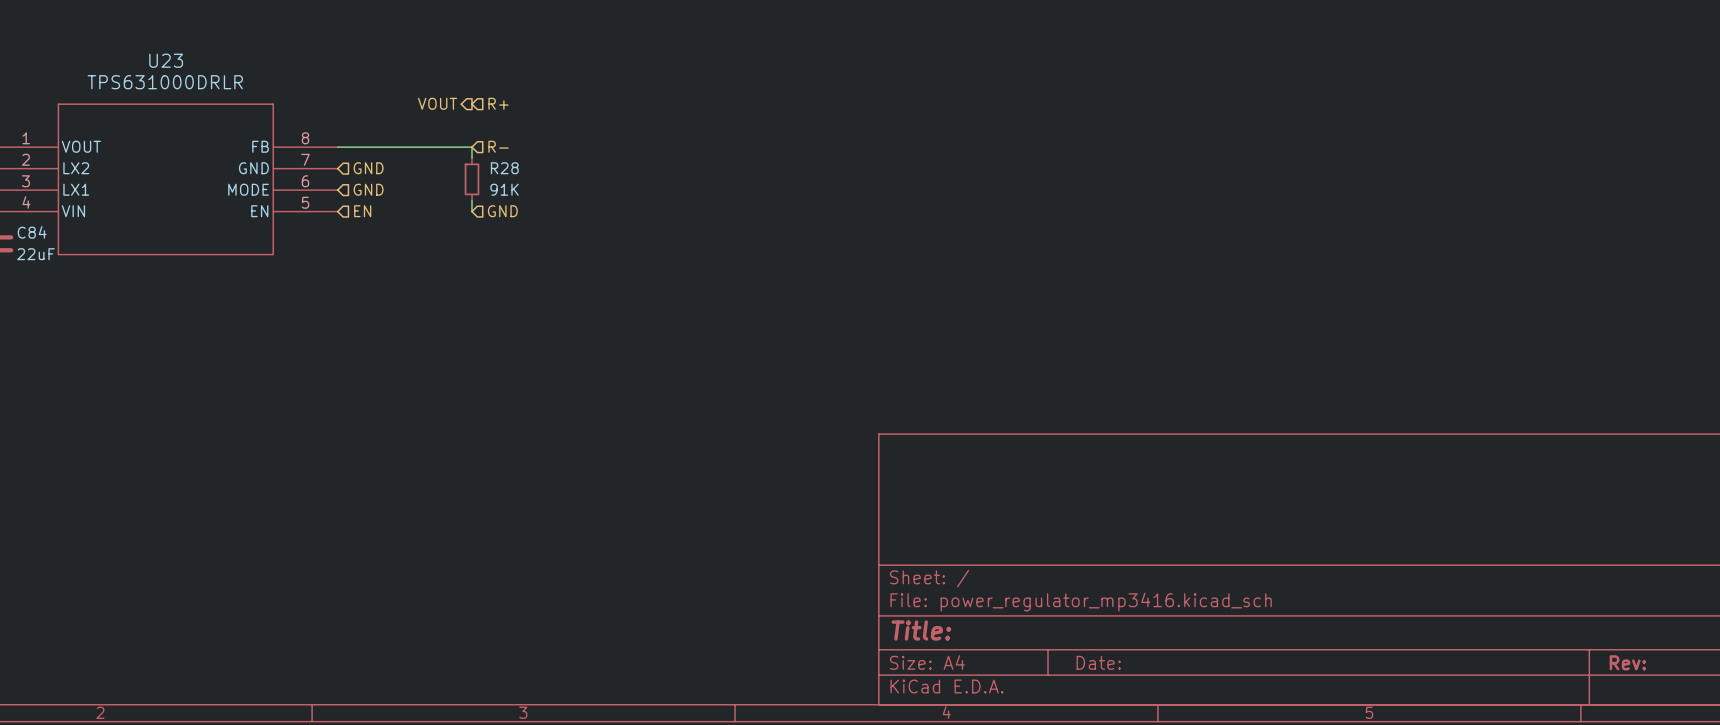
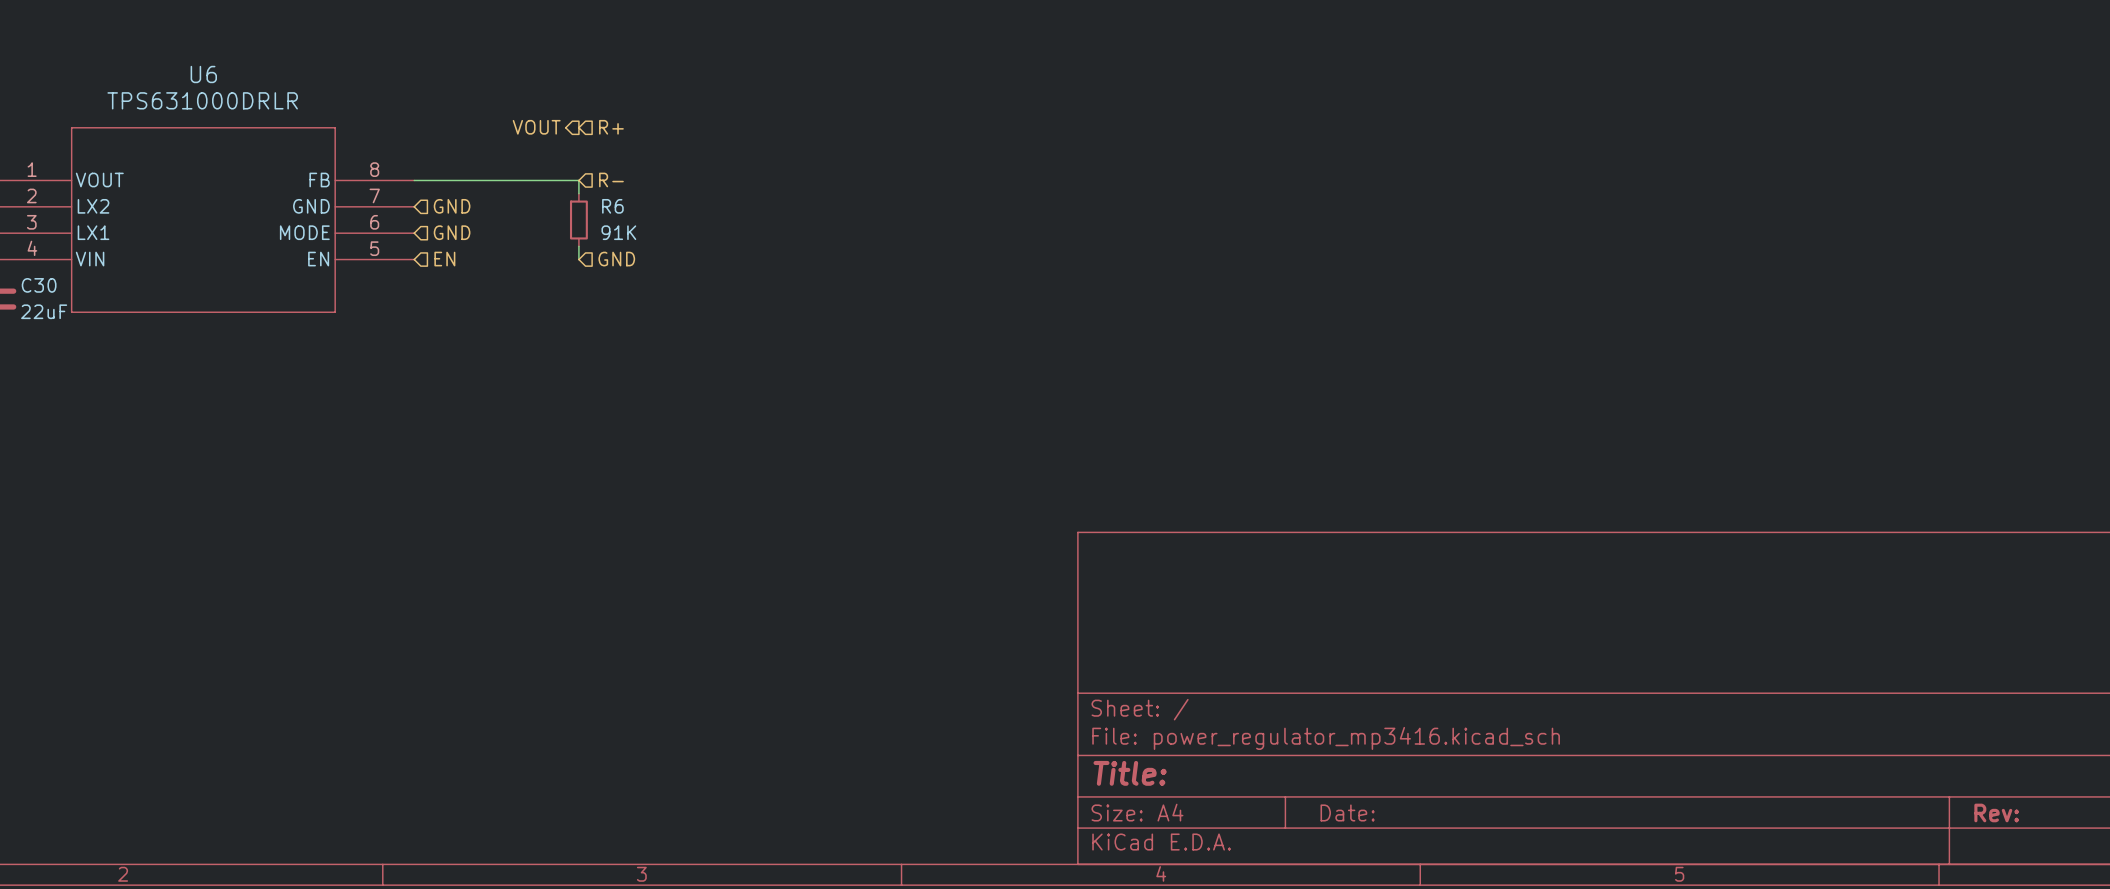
U23 name: U23 (166, 60) -> U6 (203, 74)
R28 name: R28 (504, 168) -> R6 (612, 206)
C84 name: C84 (32, 232) -> C30 (39, 285)

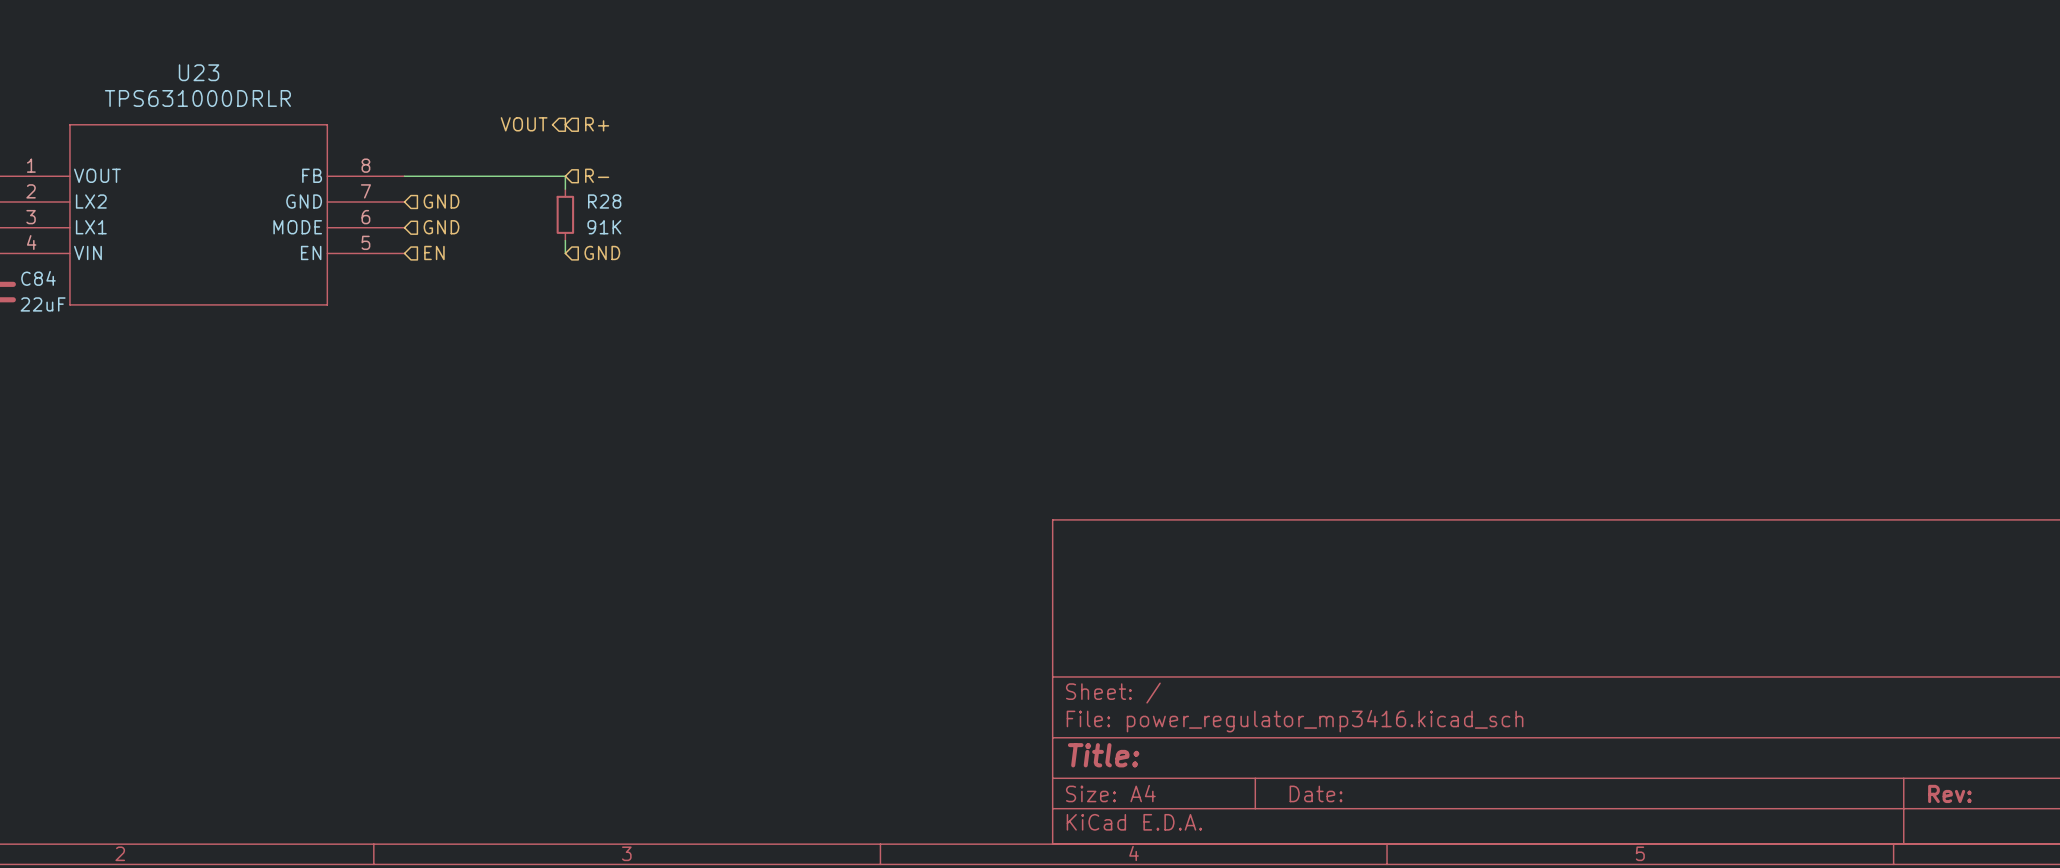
U6 name: U6 (203, 74) -> U23 (199, 72)
R6 name: R6 (612, 206) -> R28 (604, 201)
C30 name: C30 (39, 285) -> C84 (38, 278)

